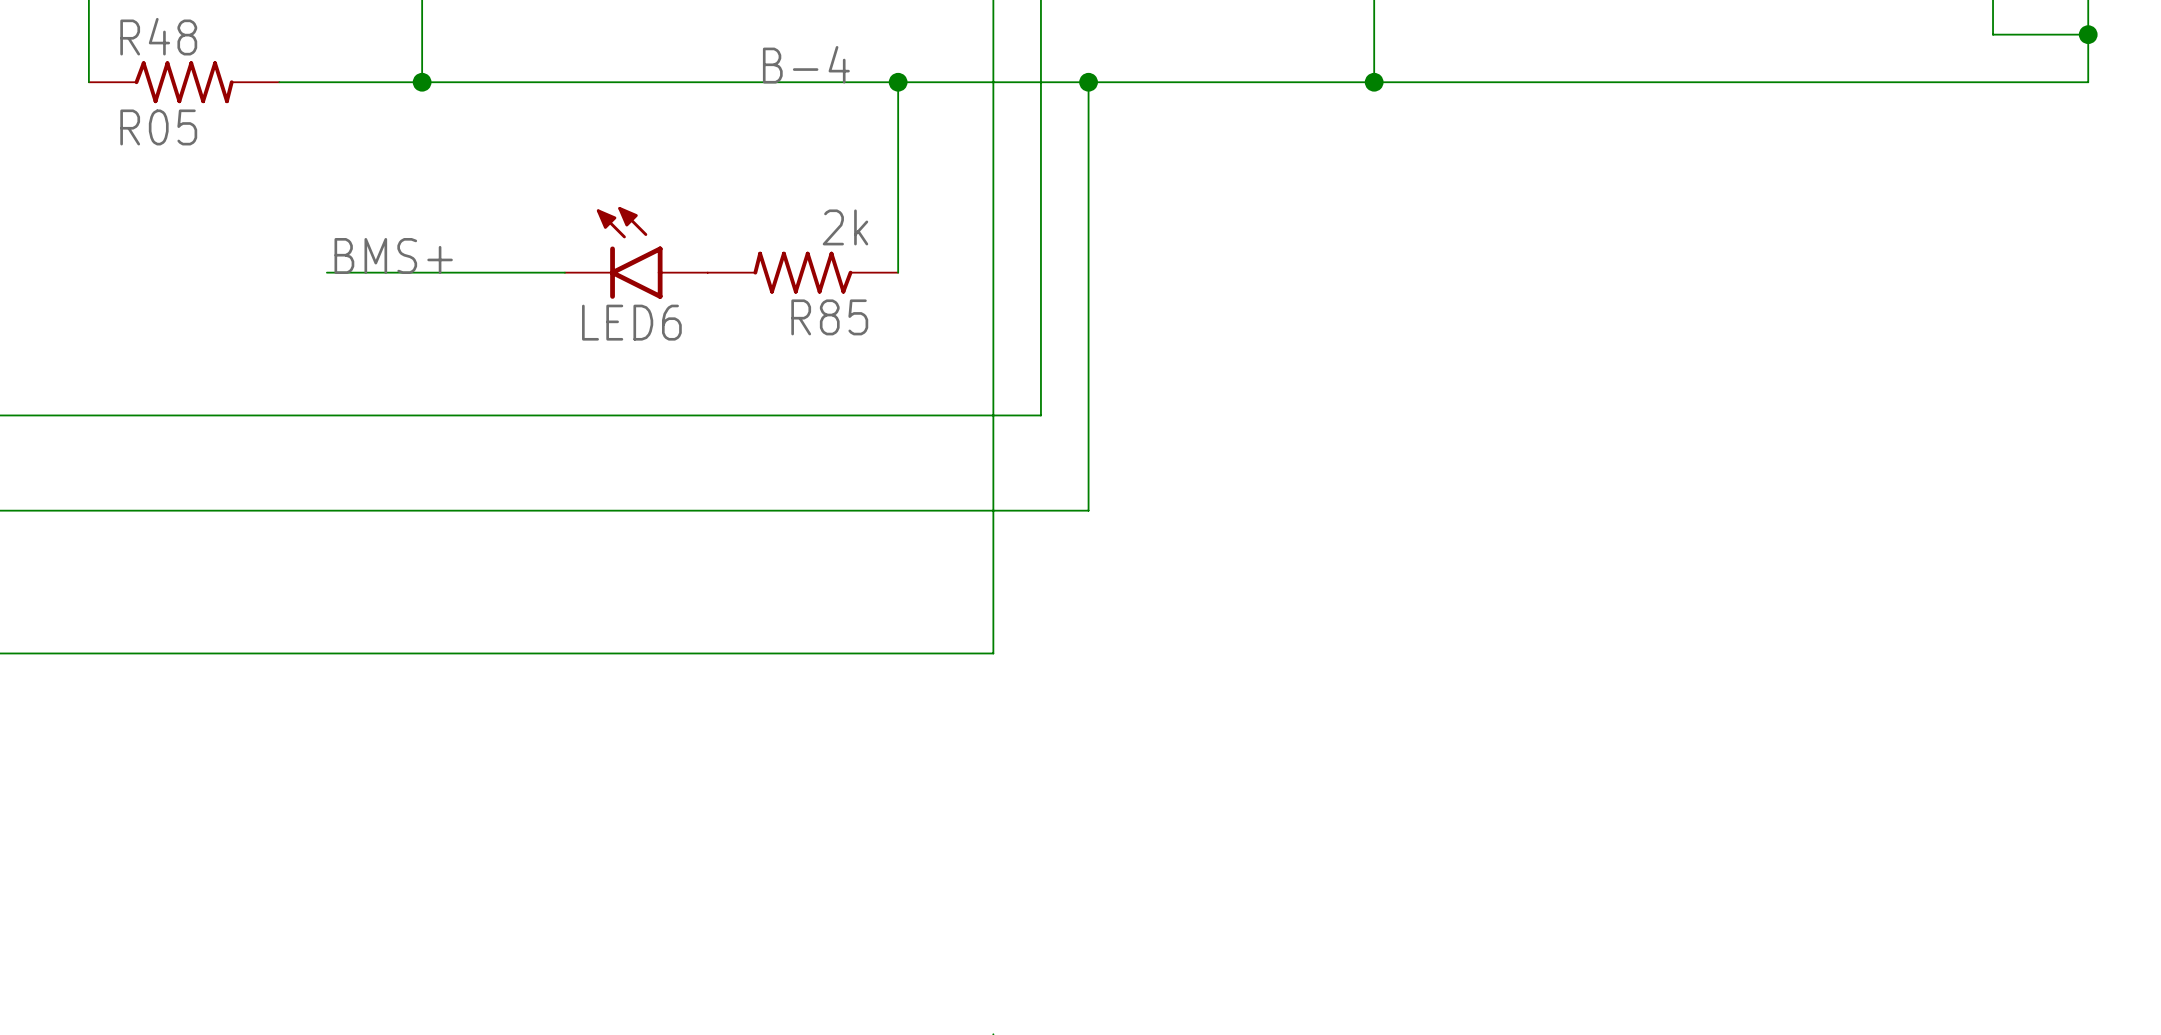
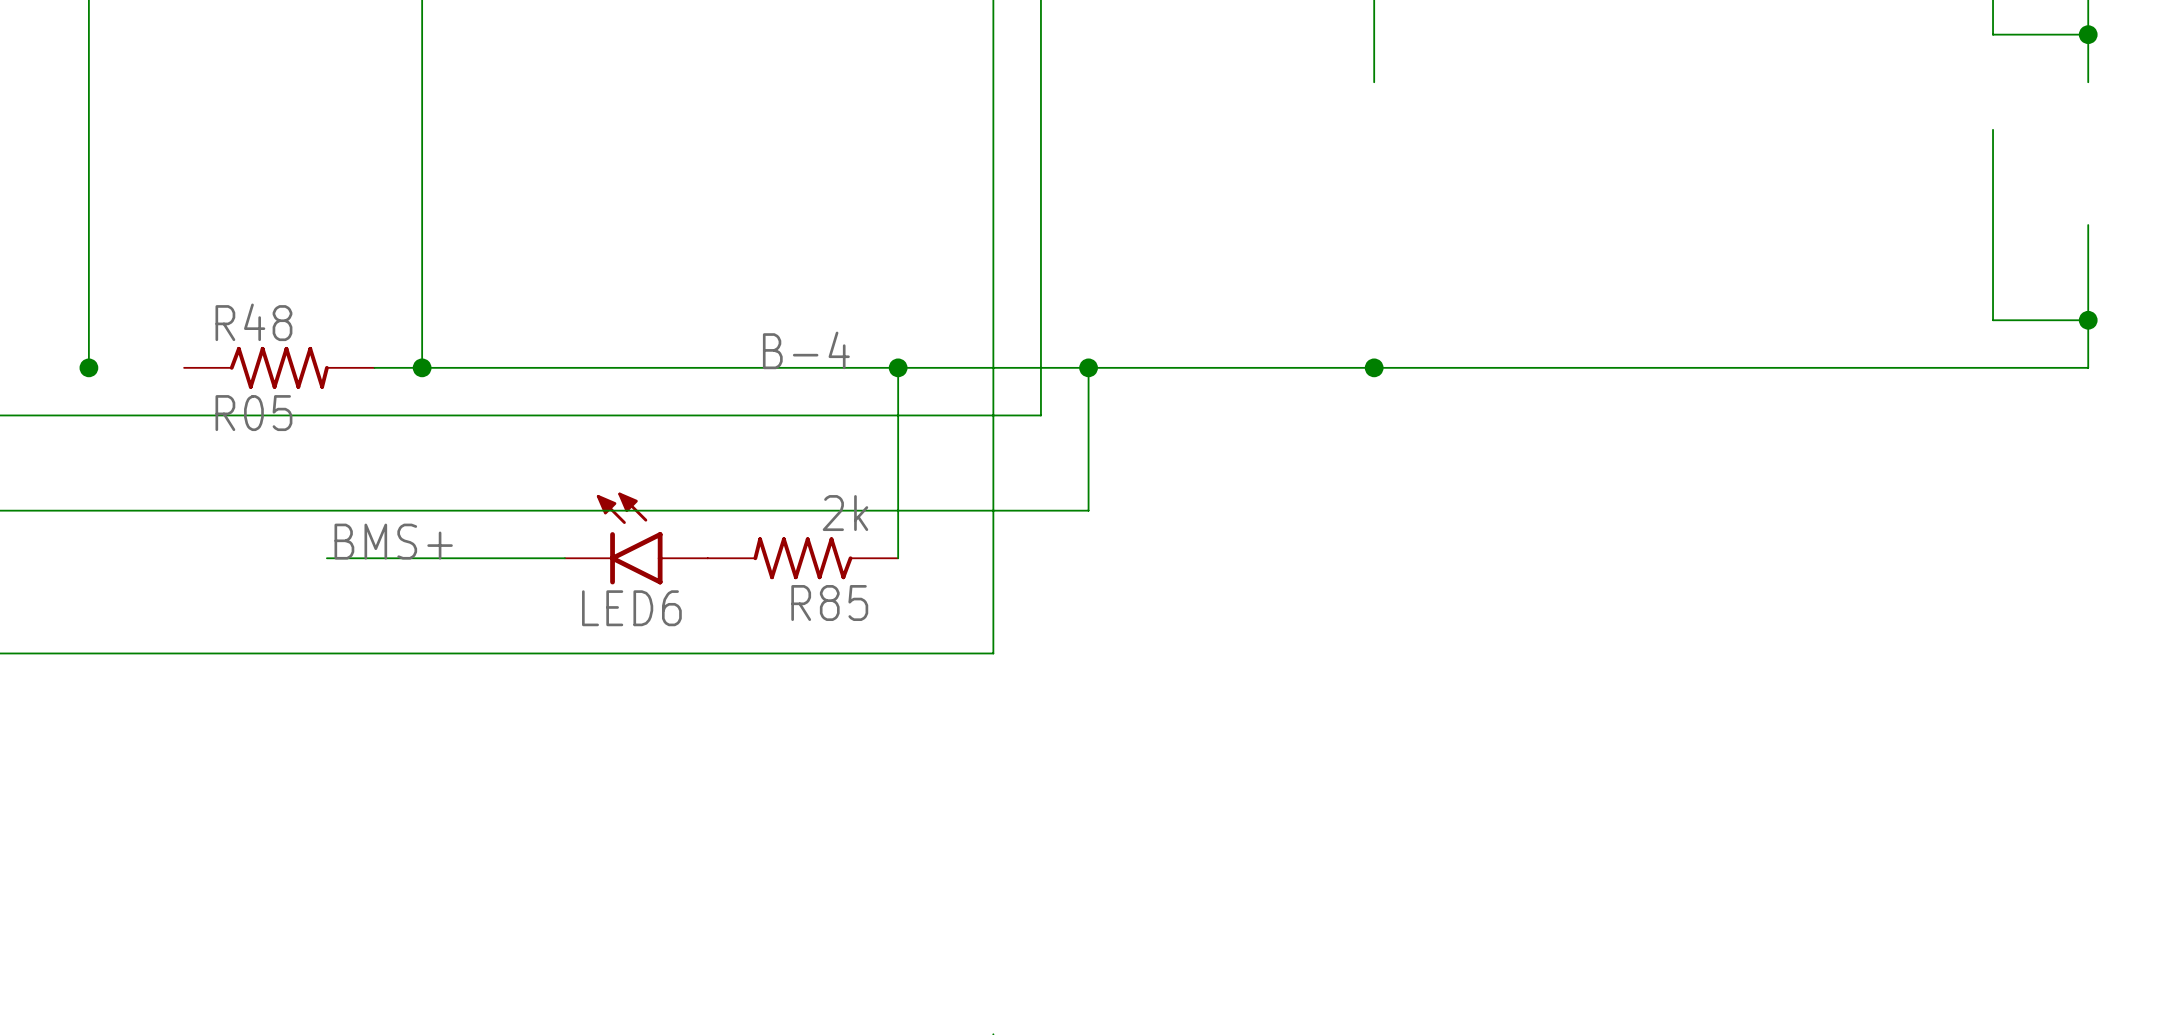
label position: B-4 (806, 64) -> B-4 (806, 350)
wire: none -> (88, 82) (88, 367)
R48 position: (184, 82) -> (279, 367)
wire: (279, 82) (2088, 82) -> none
wire: none -> (422, 82) (422, 367)
junction: (422, 82) -> none
wire: (898, 82) (898, 272) -> (898, 367) (898, 558)
junction: (898, 82) -> none
wire: (1088, 82) (1088, 367) -> none
junction: (1088, 82) -> none
junction: (1374, 82) -> none
wire: none -> (1993, 129) (1993, 320) (2088, 320)
wire: none -> (2088, 225) (2088, 367) (374, 367)
LED6 position: (636, 252) -> (636, 538)
label position: BMS+ (393, 255) -> BMS+ (393, 541)
wire: (326, 272) (564, 272) -> (326, 558) (564, 558)
R85 position: (802, 272) -> (802, 558)
junction: none -> (2088, 320)
junction: none -> (88, 367)
junction: none -> (422, 367)
junction: none -> (898, 367)
junction: none -> (1088, 367)
junction: none -> (1374, 367)

